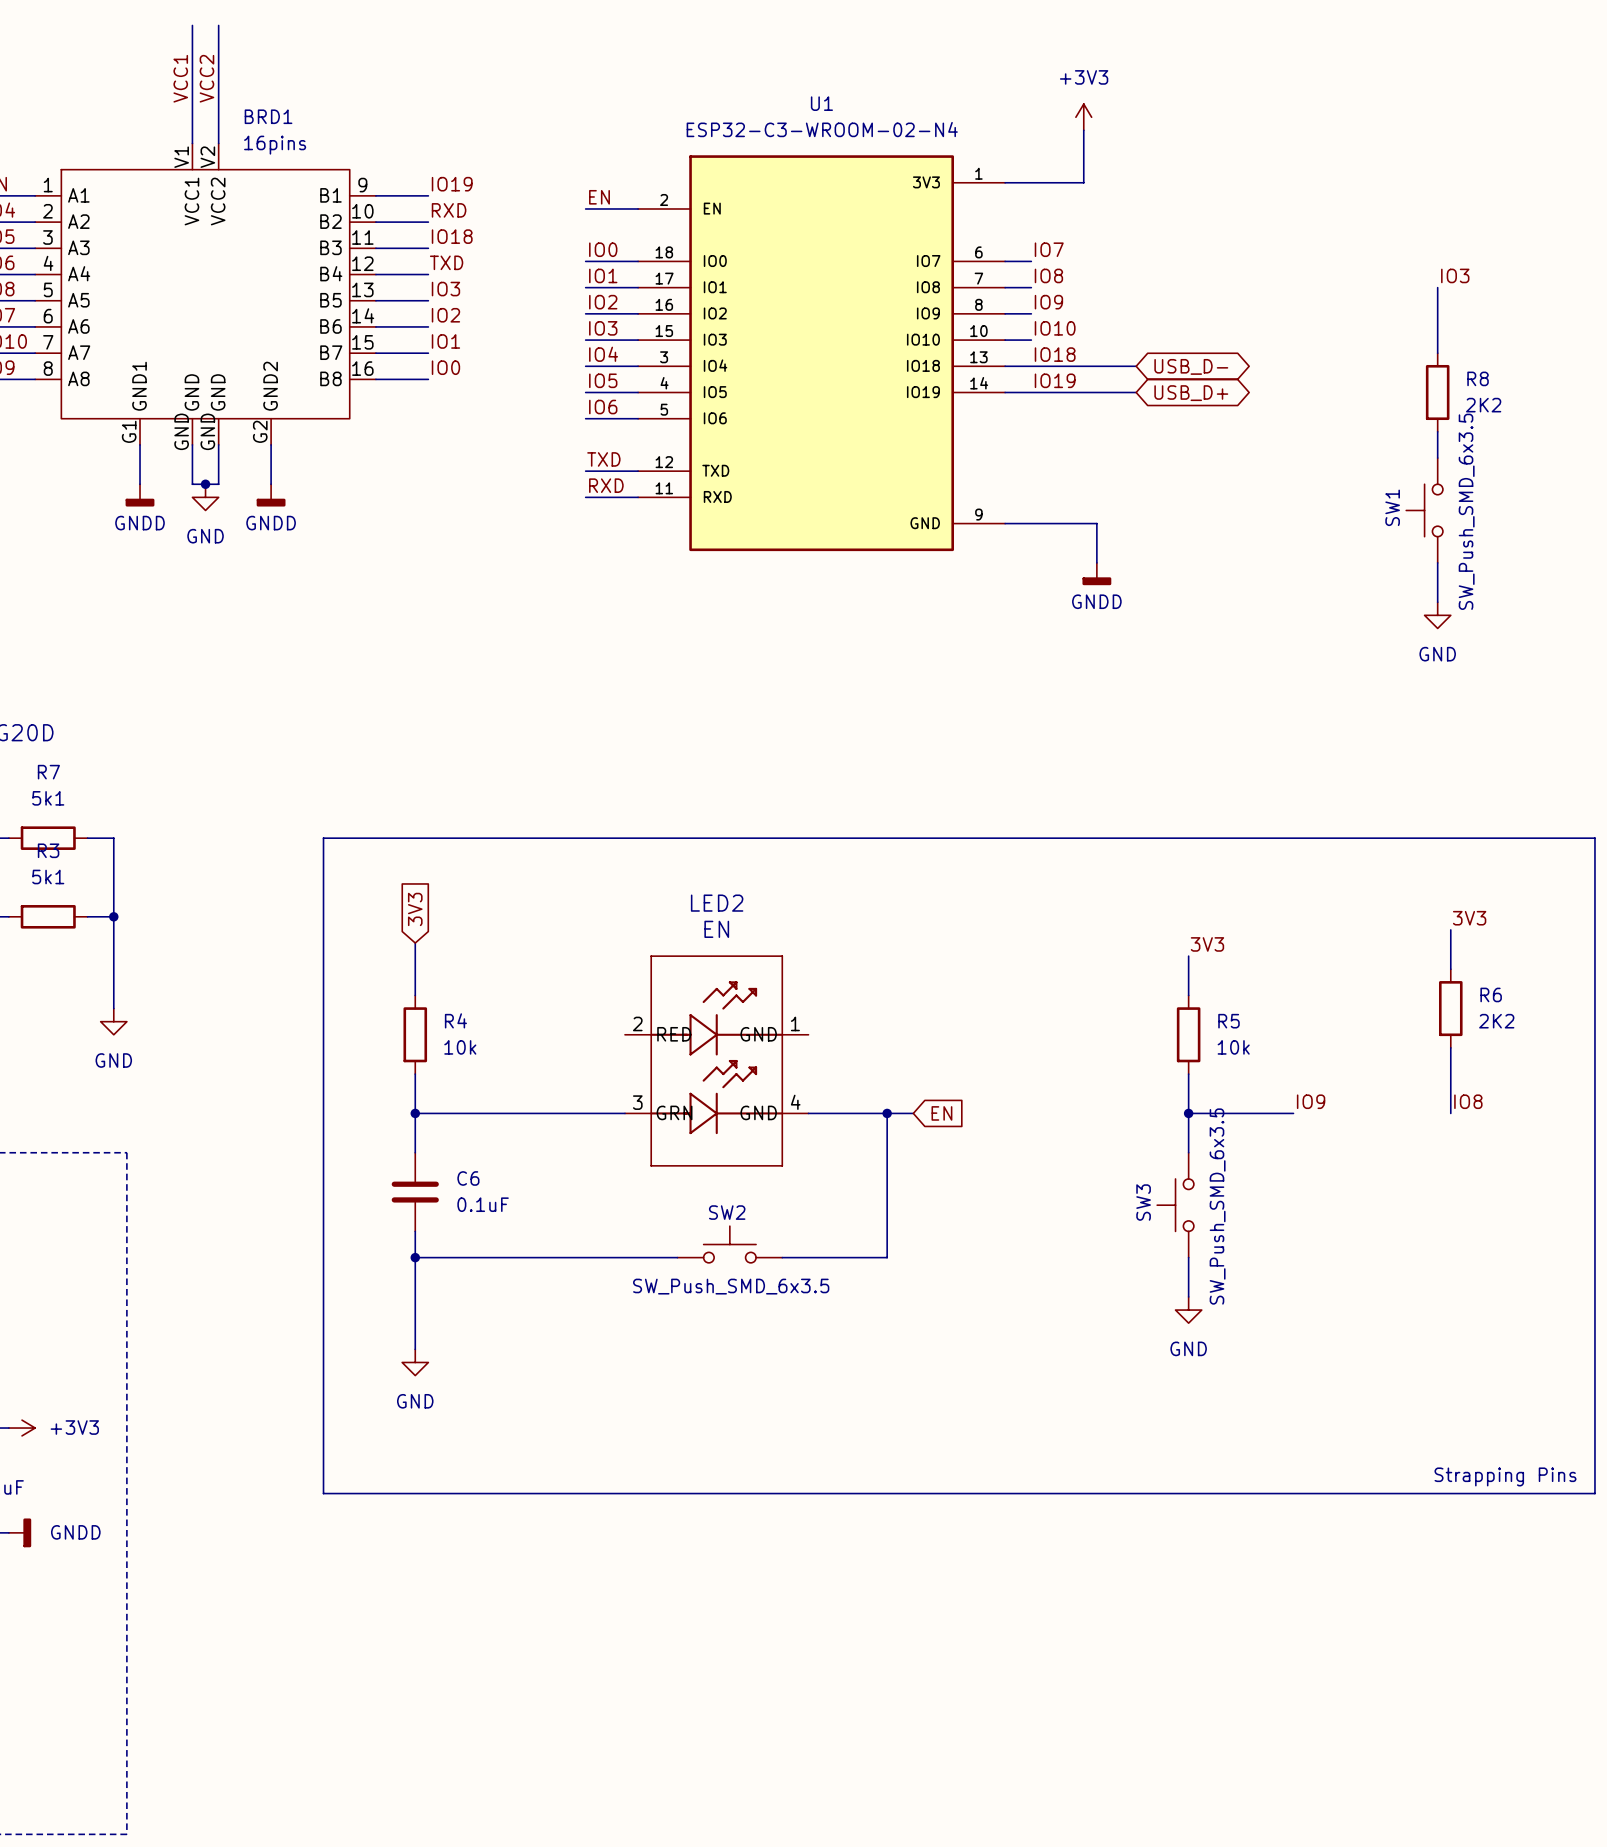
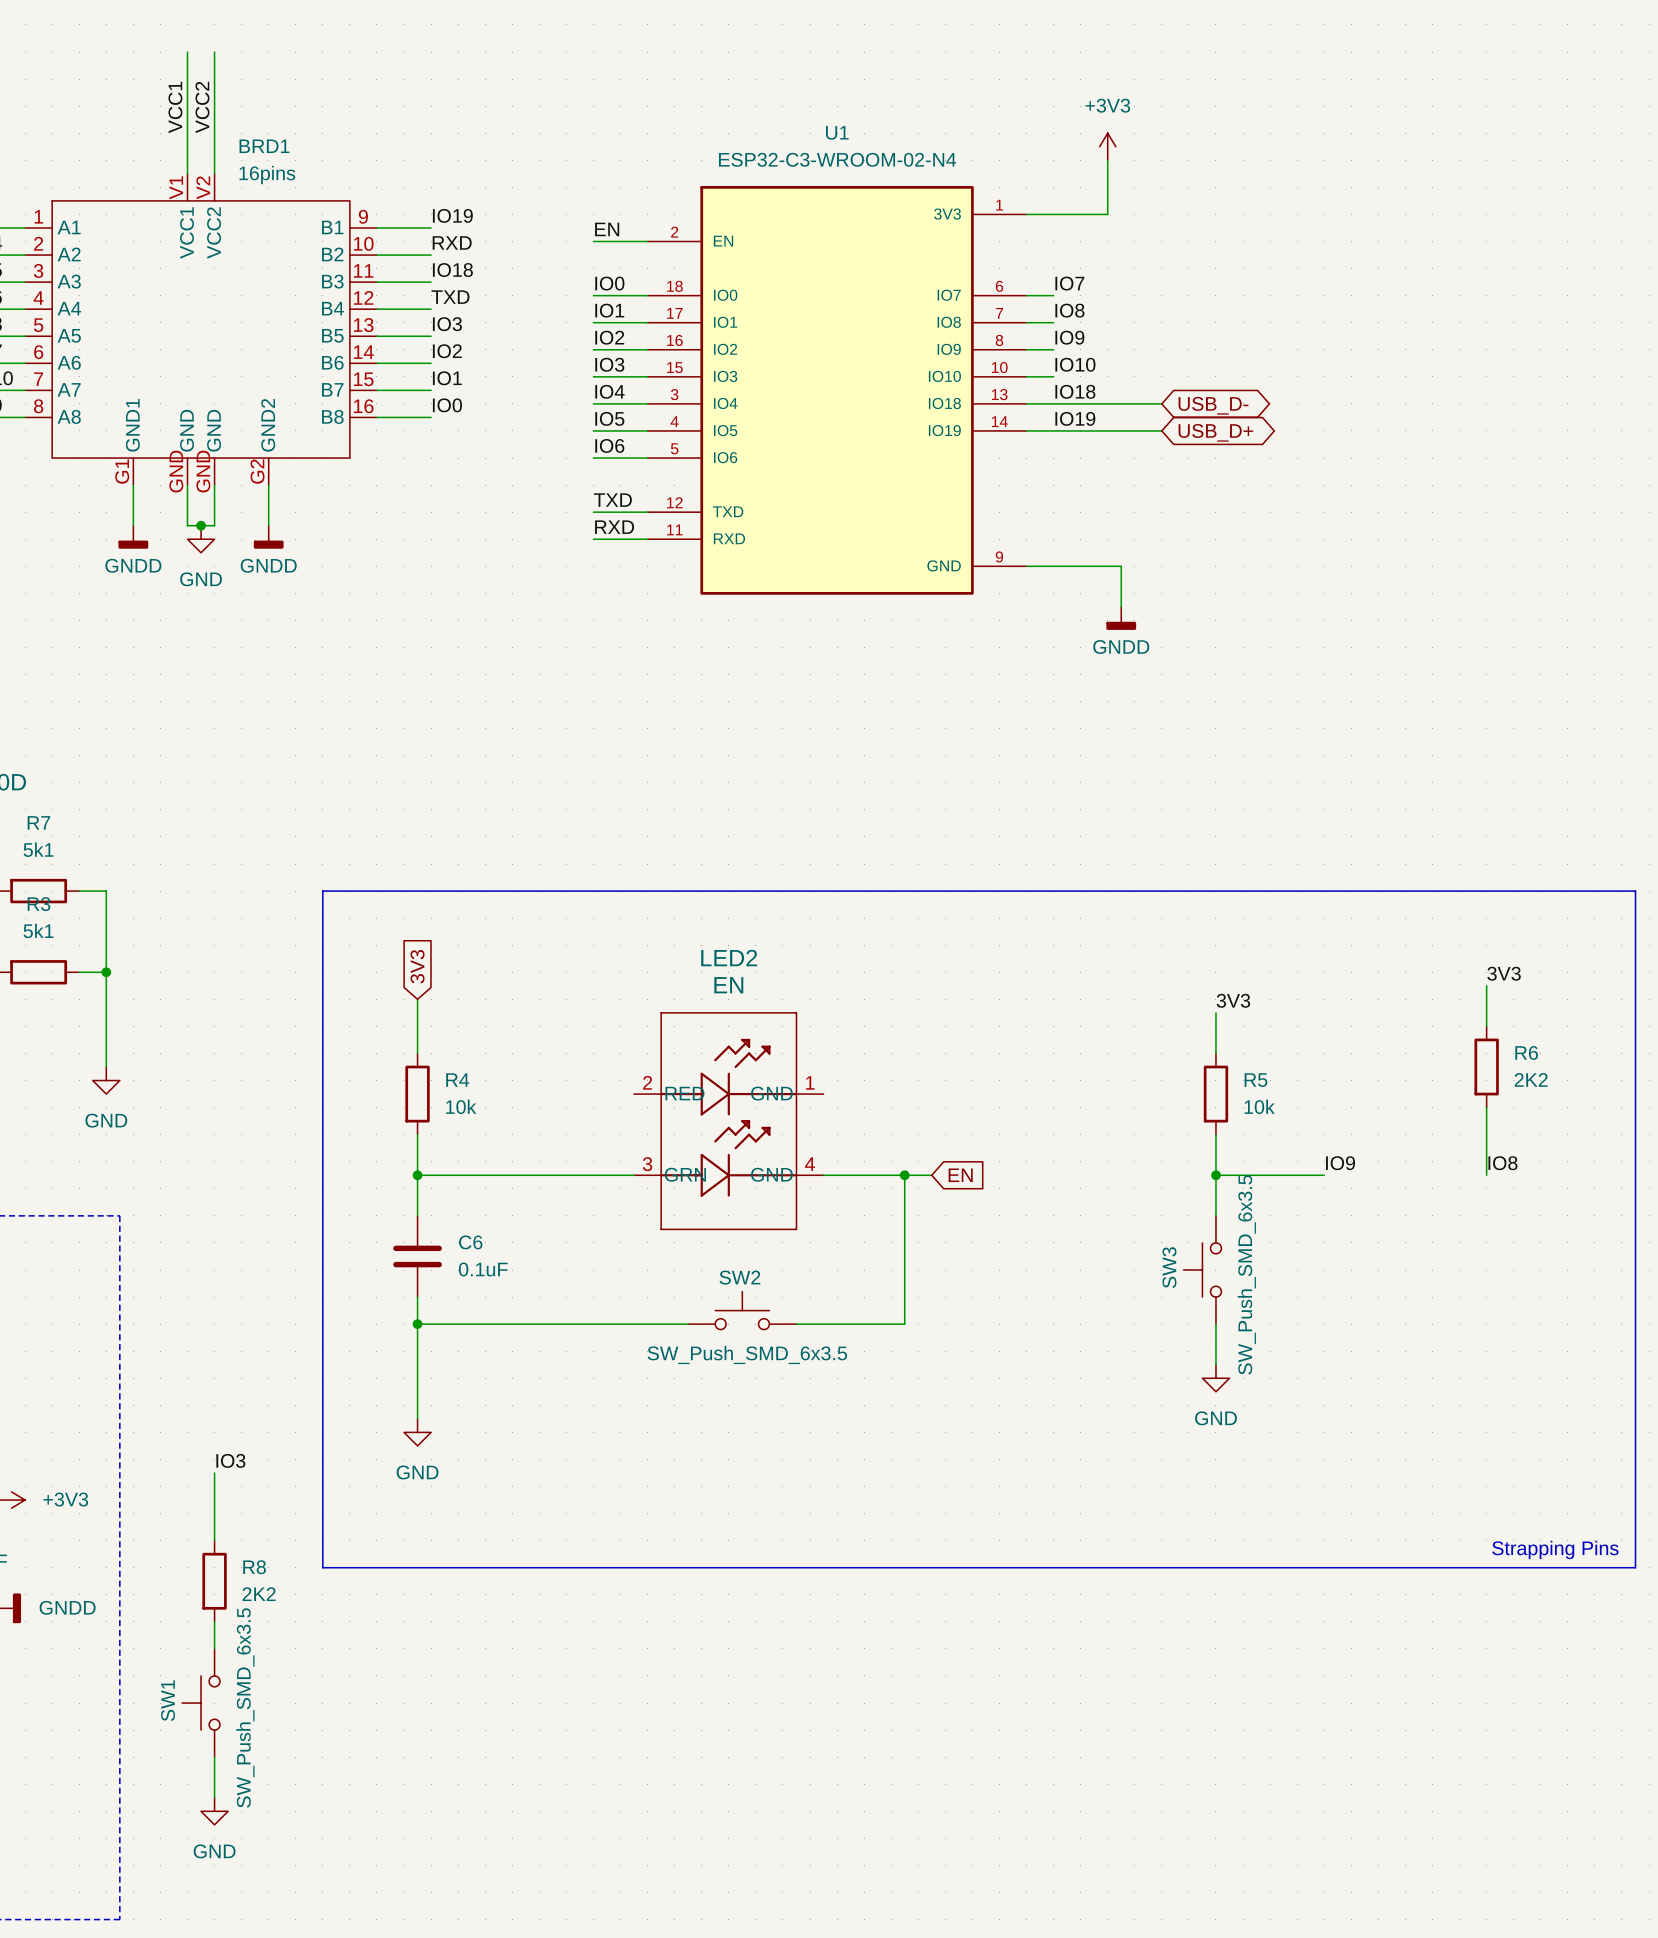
label: IO3 (1455, 275) -> none
wire: (1437, 287) (1437, 353) -> none
R8 position: (1437, 392) -> (214, 1581)
wire: (1437, 431) (1437, 458) -> none
SW1 position: (1424, 510) -> (201, 1703)
wire: (1437, 562) (1437, 602) -> none
power symbol: GND (1437, 615) -> none
label: none -> IO3 (230, 1460)
wire: none -> (214, 1472) (214, 1540)
wire: none -> (214, 1621) (214, 1648)
wire: none -> (214, 1757) (214, 1797)
power symbol: none -> GND (214, 1811)

